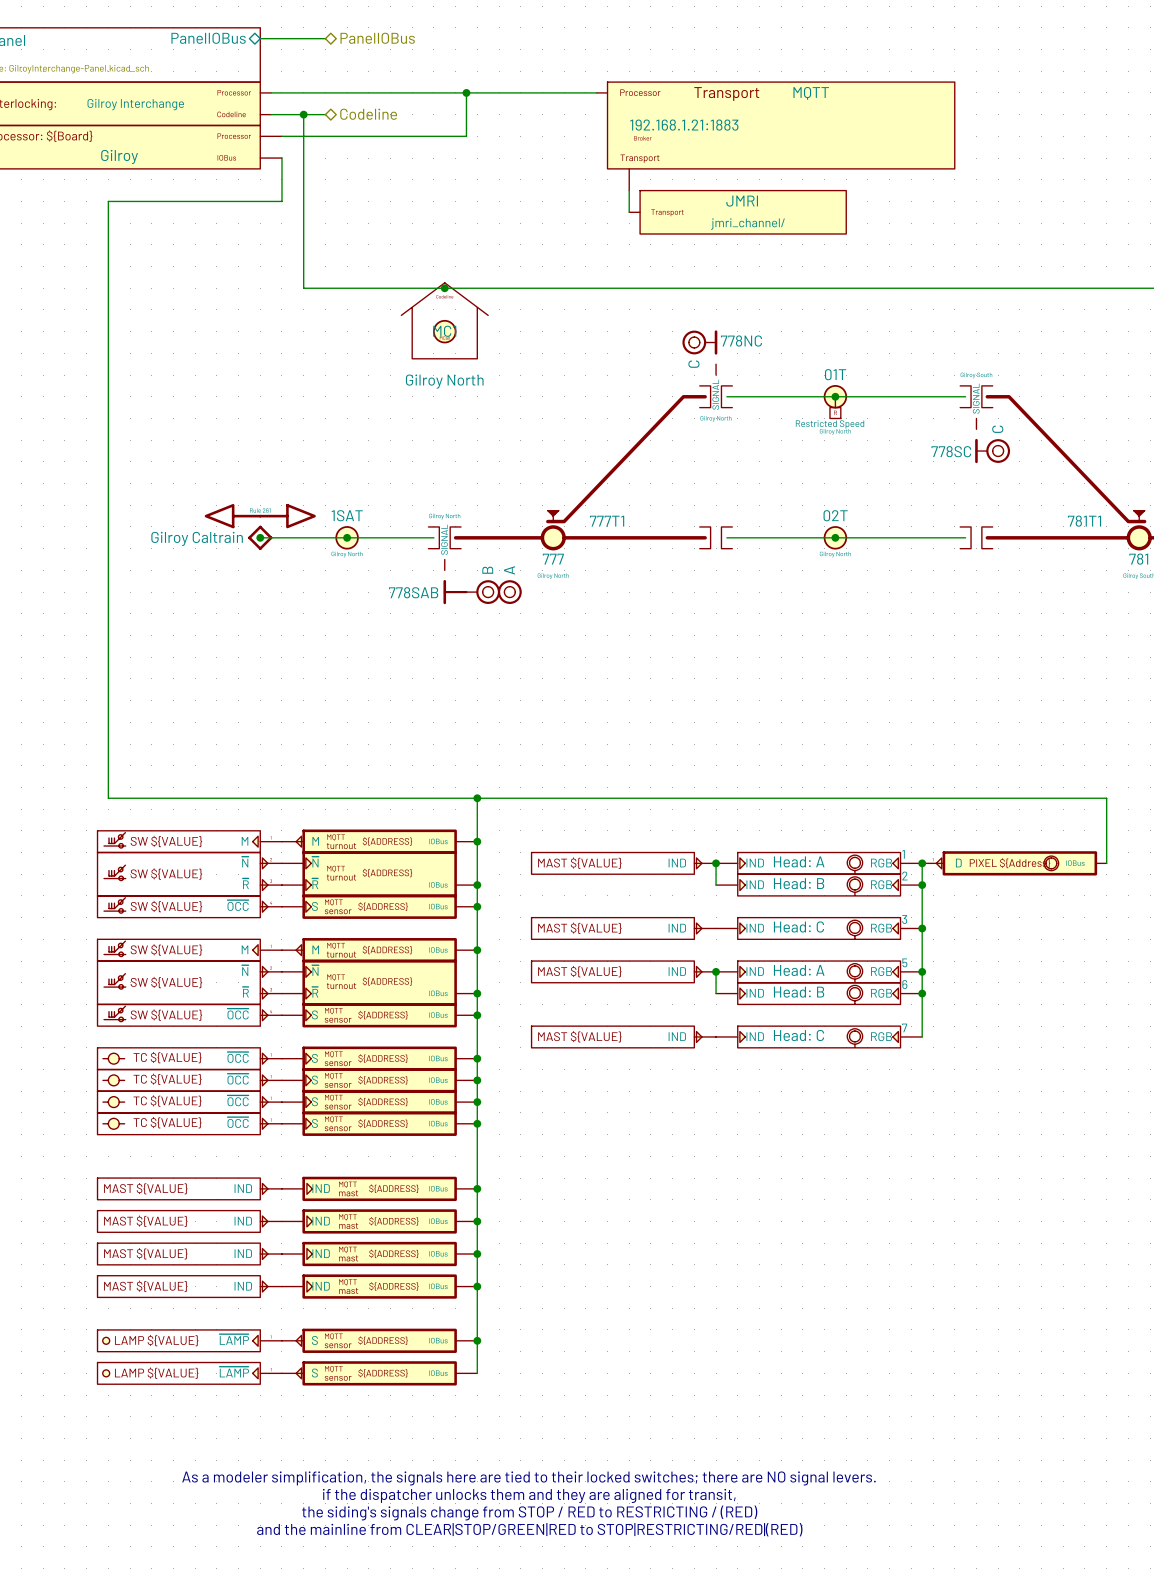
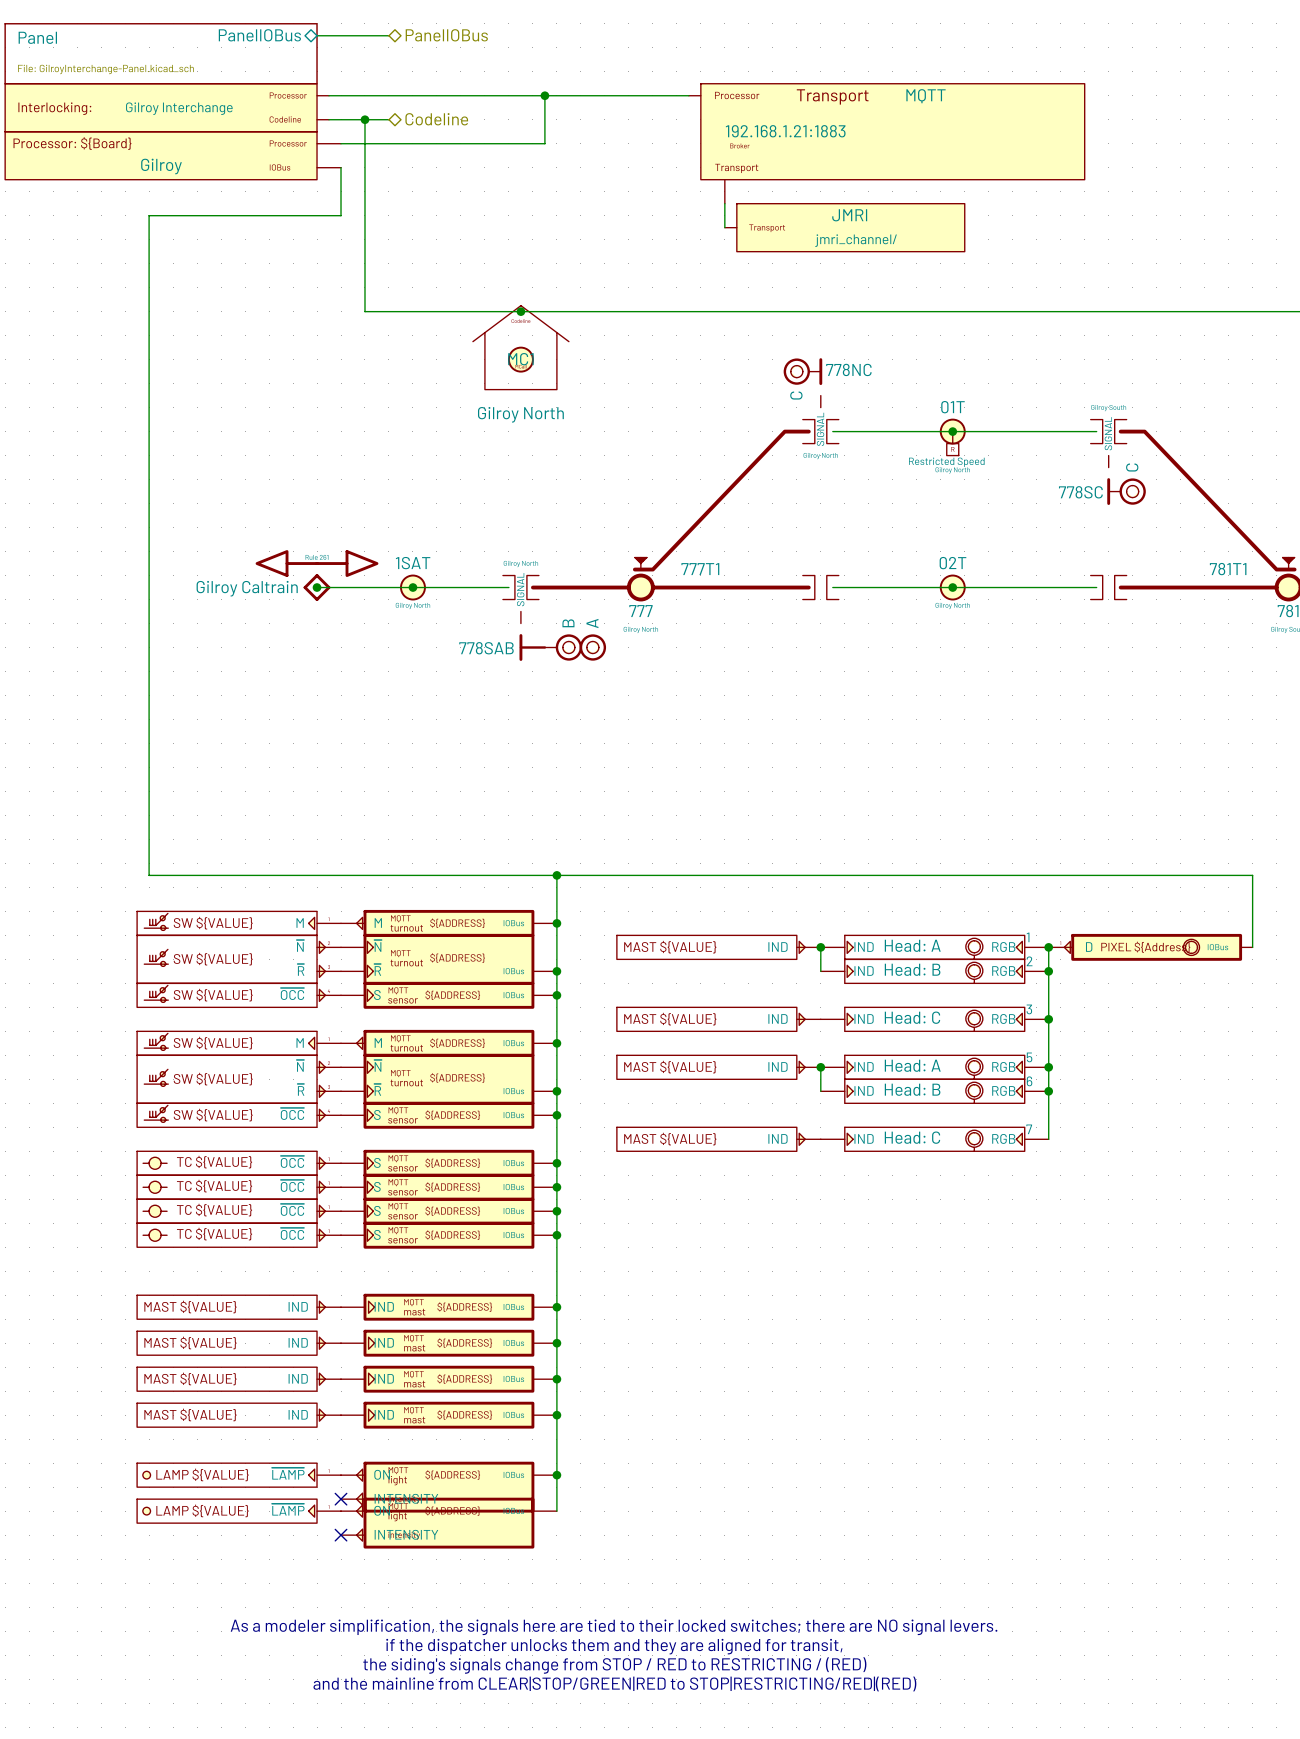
part: (379, 1340) -> none
part: none -> (448, 1487)
no-connect mark: none -> (341, 1499)
part: (379, 1373) -> none
part: none -> (448, 1523)
no-connect mark: none -> (341, 1535)

